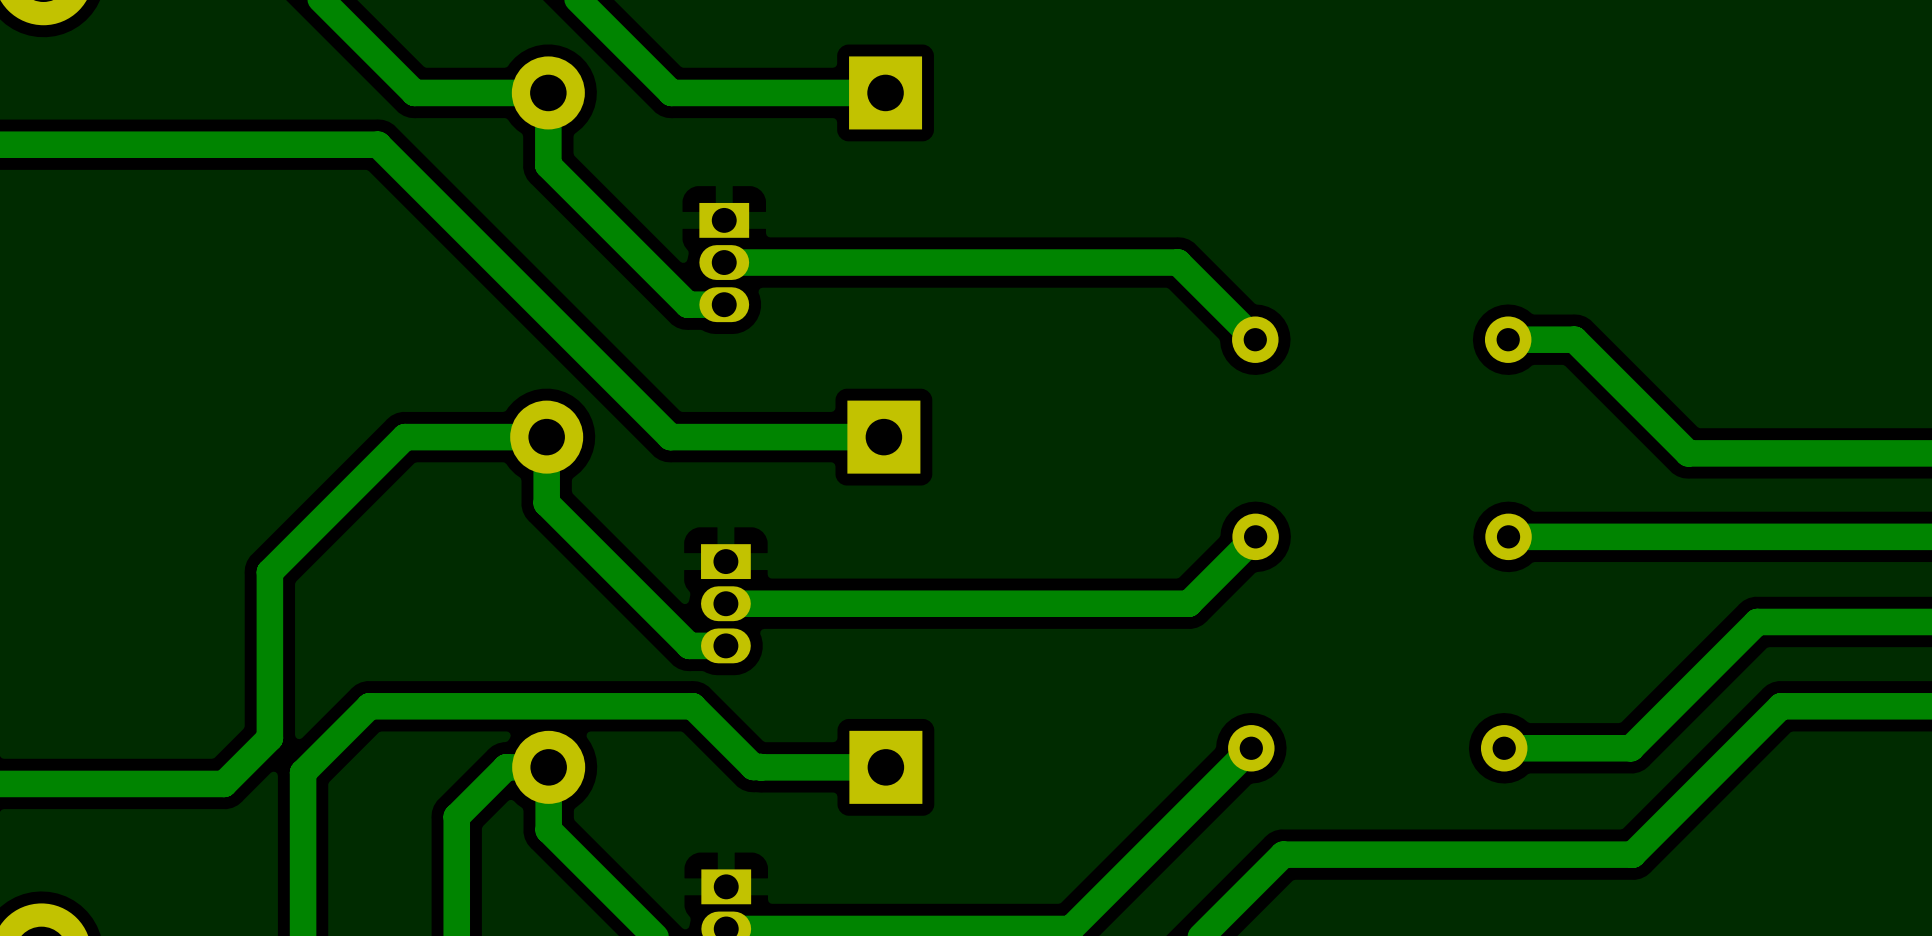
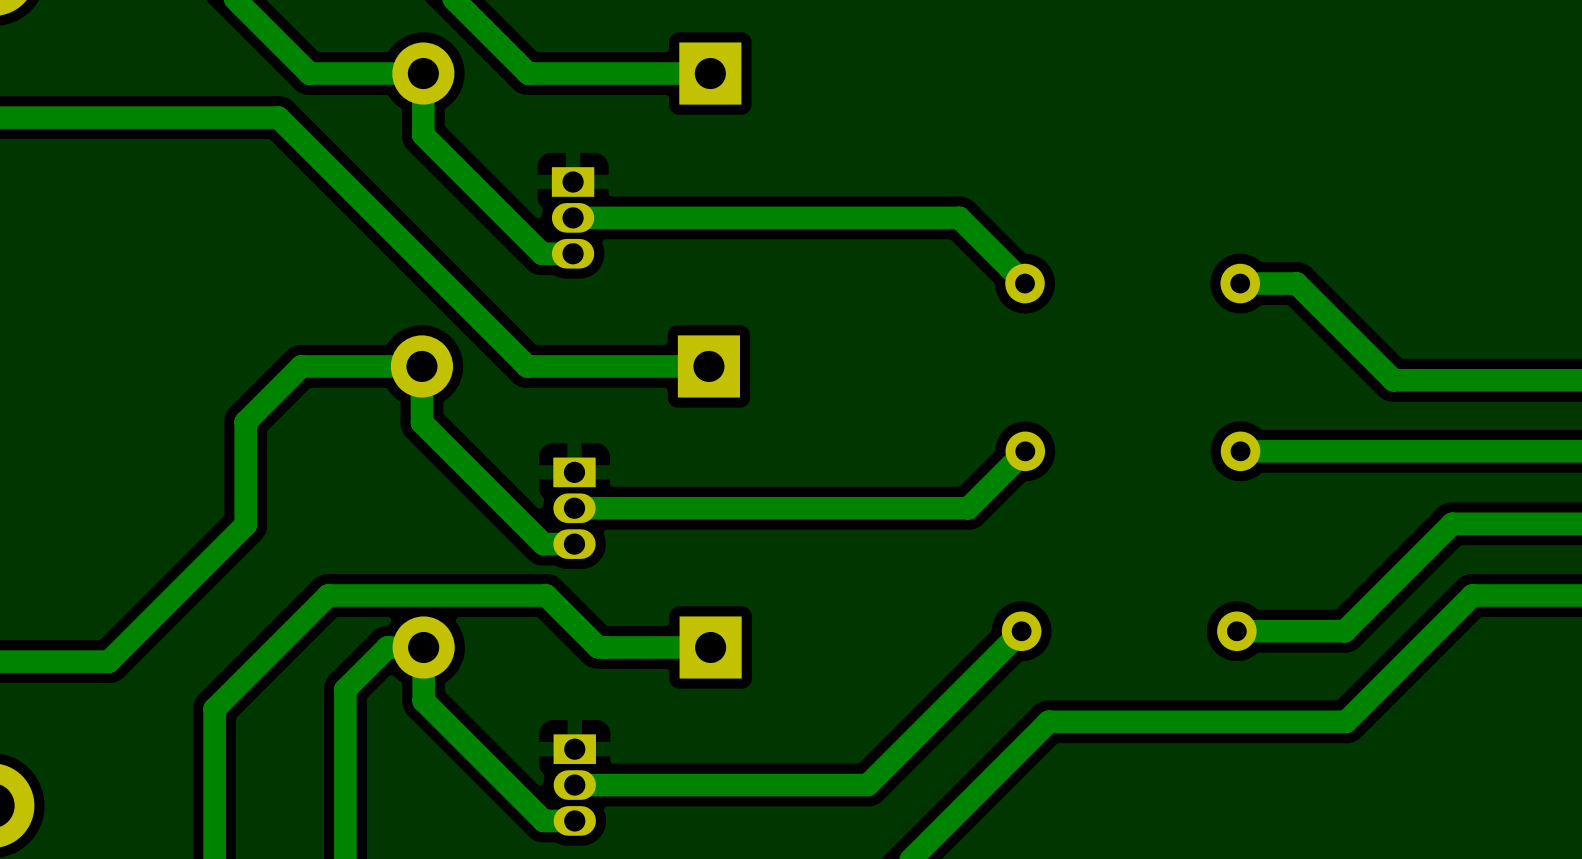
track: (339, 502) (269, 572) (269, 738) (224, 783) (178, 783) -> (245, 422) (245, 524) (108, 661)
track: (436, 706) (369, 706) (303, 772) (303, 839) -> (328, 595) (214, 709)

